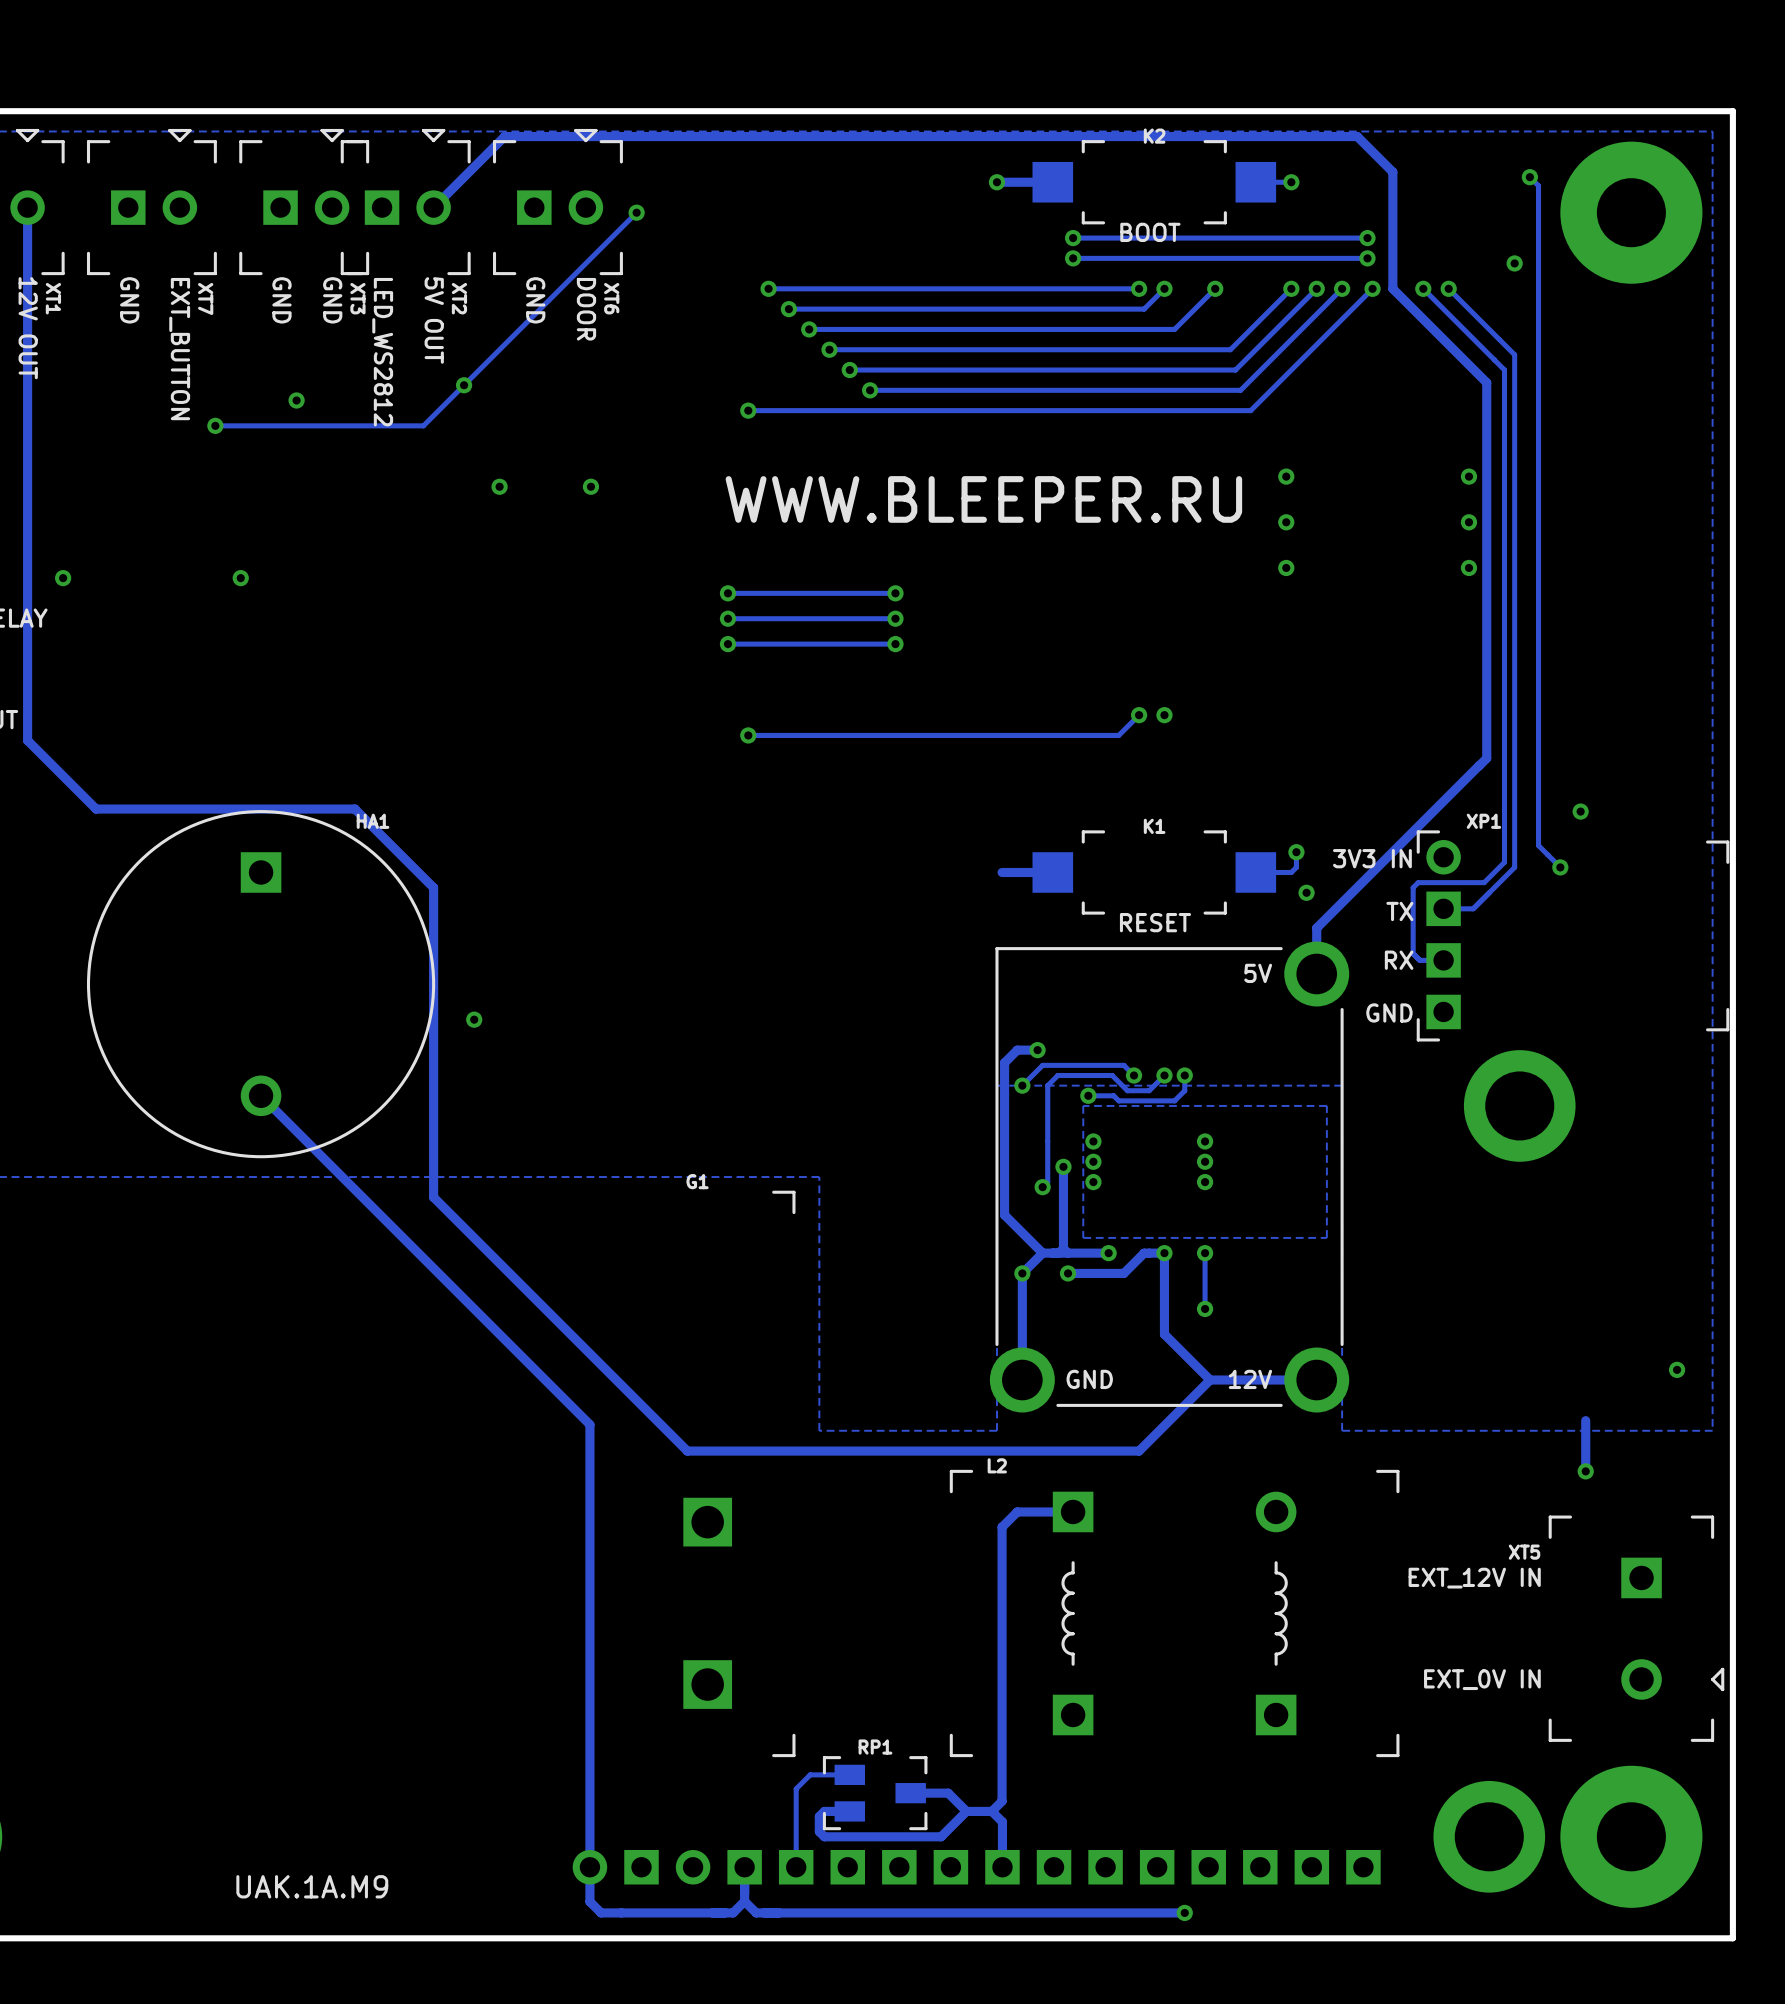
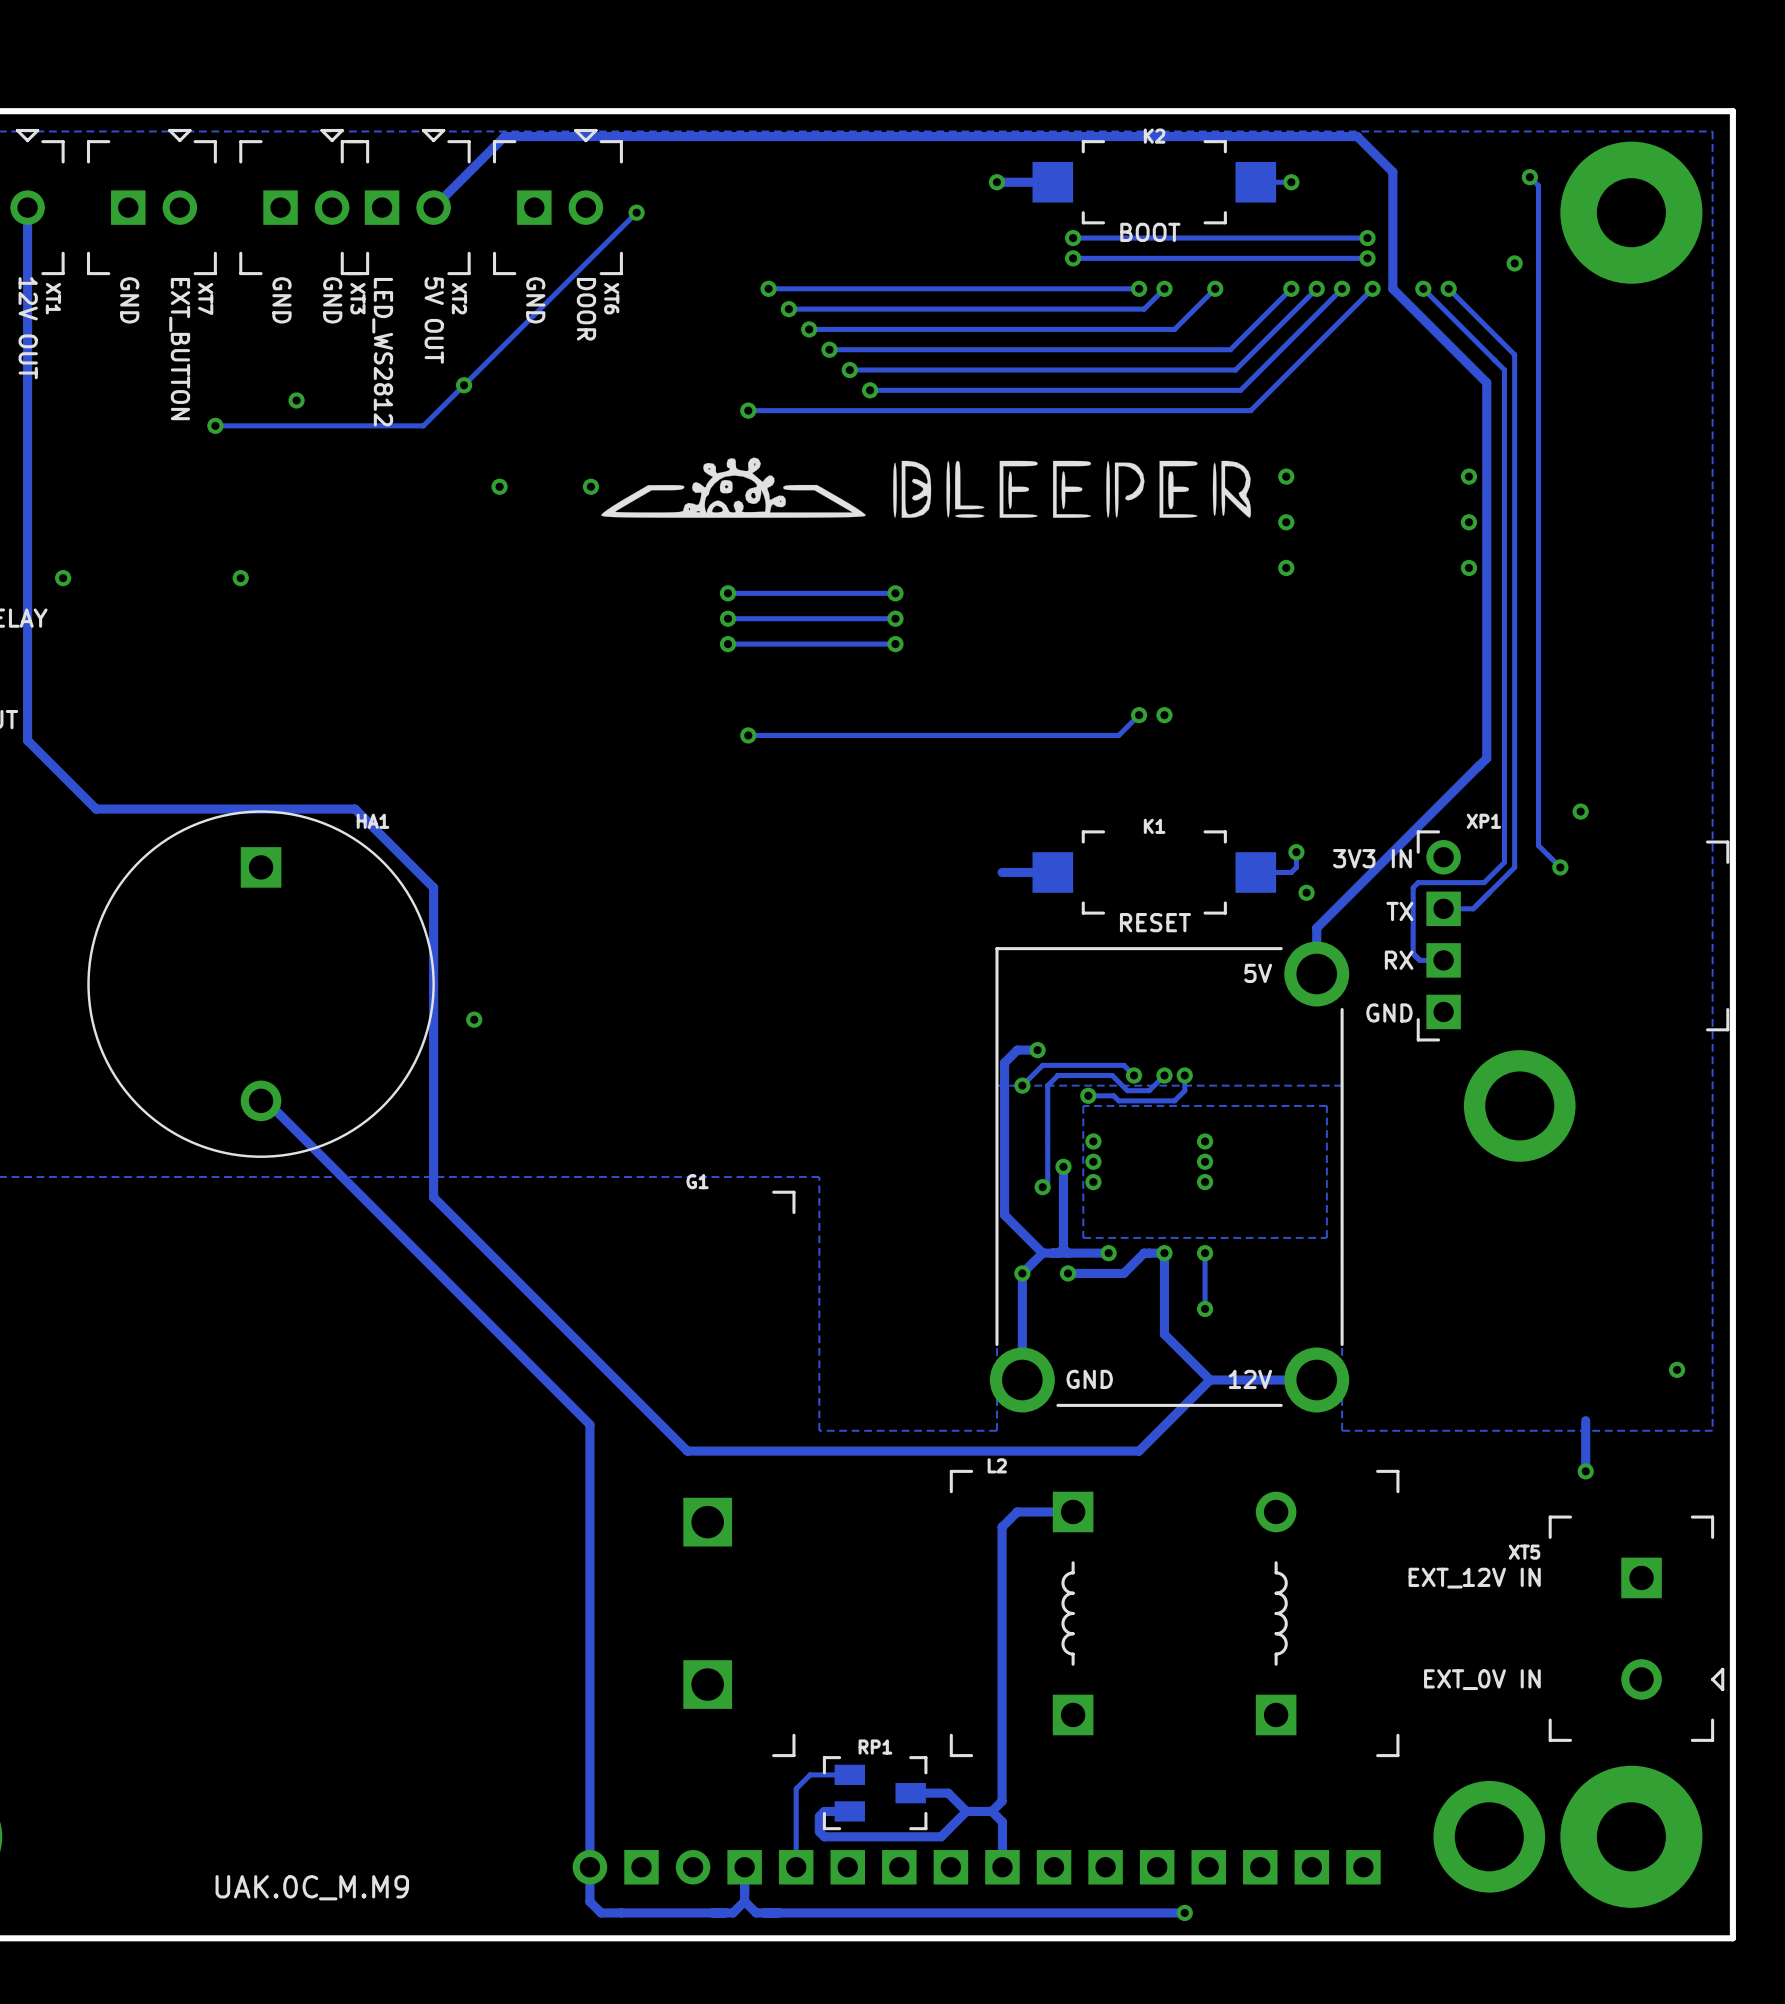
drawing: none -> [601, 457, 1251, 518]
text: WWW.BLEEPER.RU (983, 499) -> none
HA1 footprint: [86, 810, 436, 1159] -> [87, 810, 435, 1158]
text: UAK.1A.M9 (312, 1886) -> UAK.0C_M.M9 (312, 1887)

